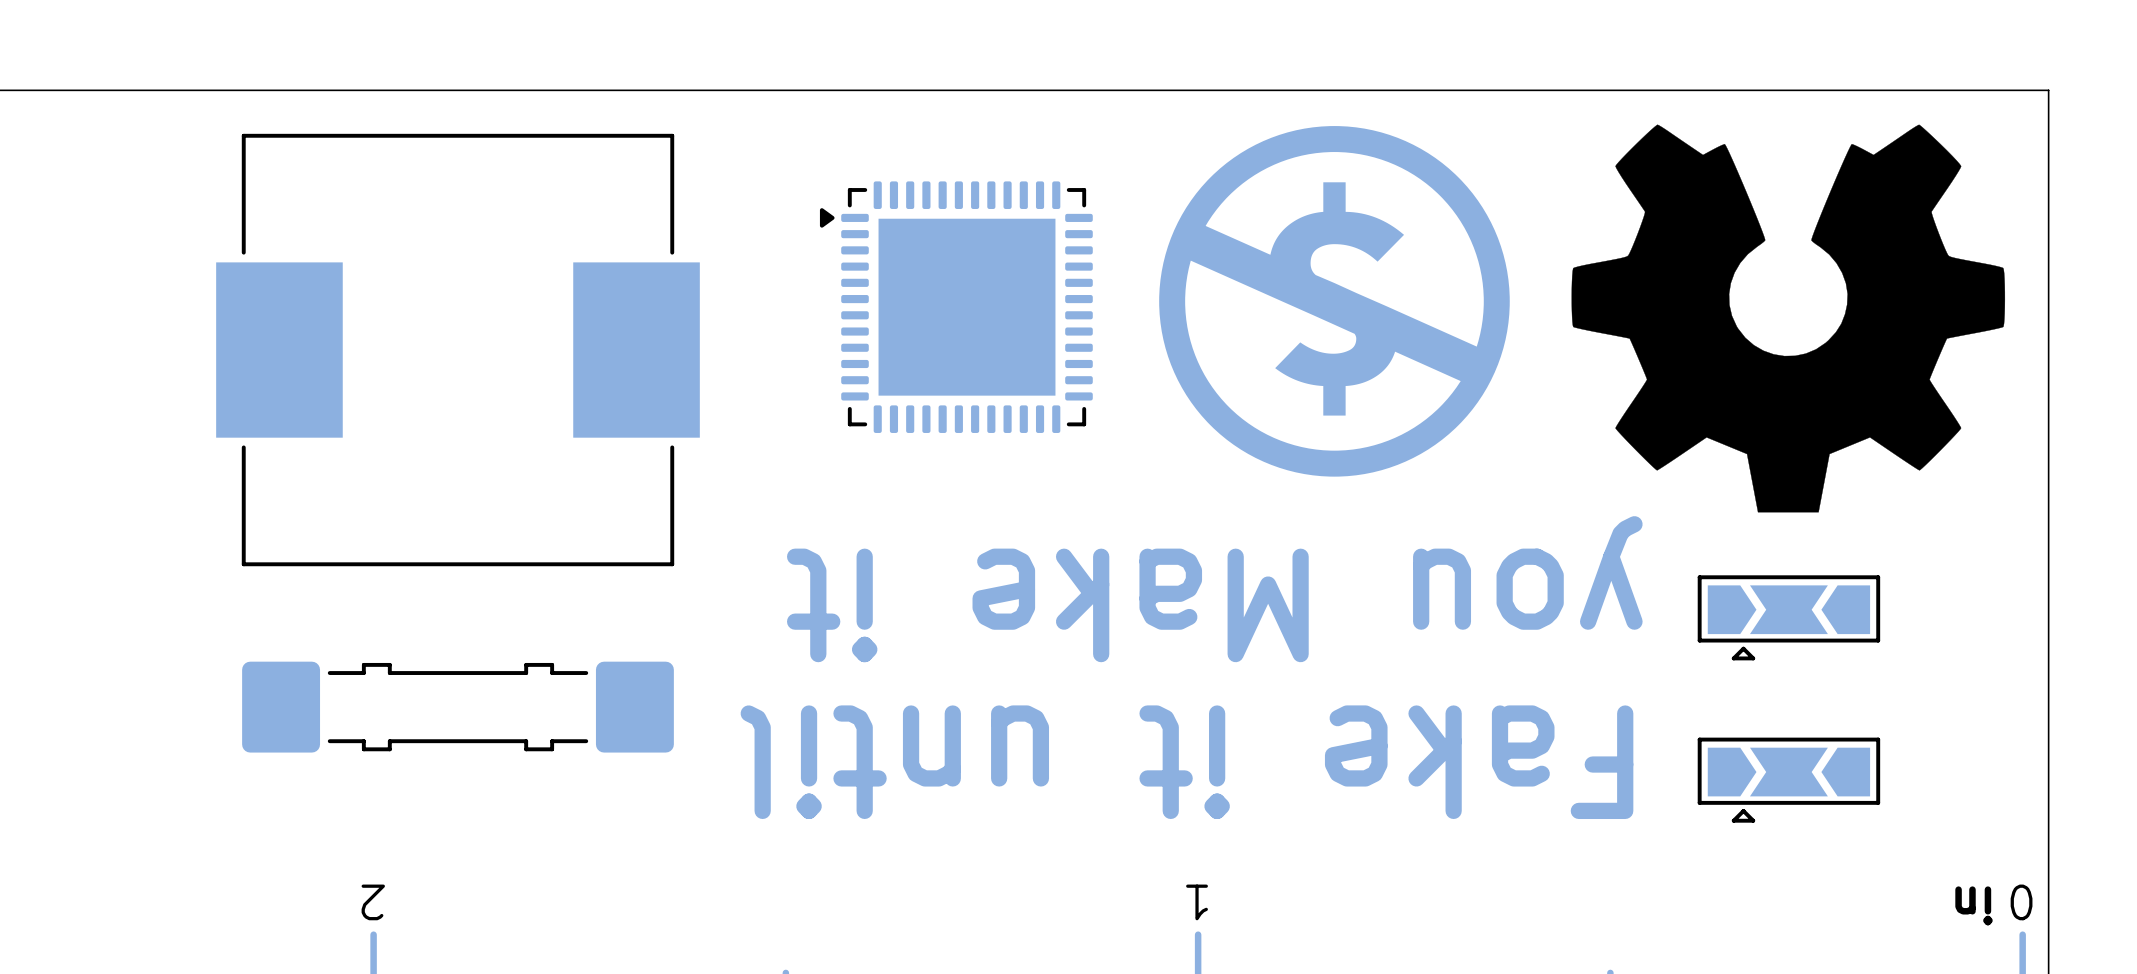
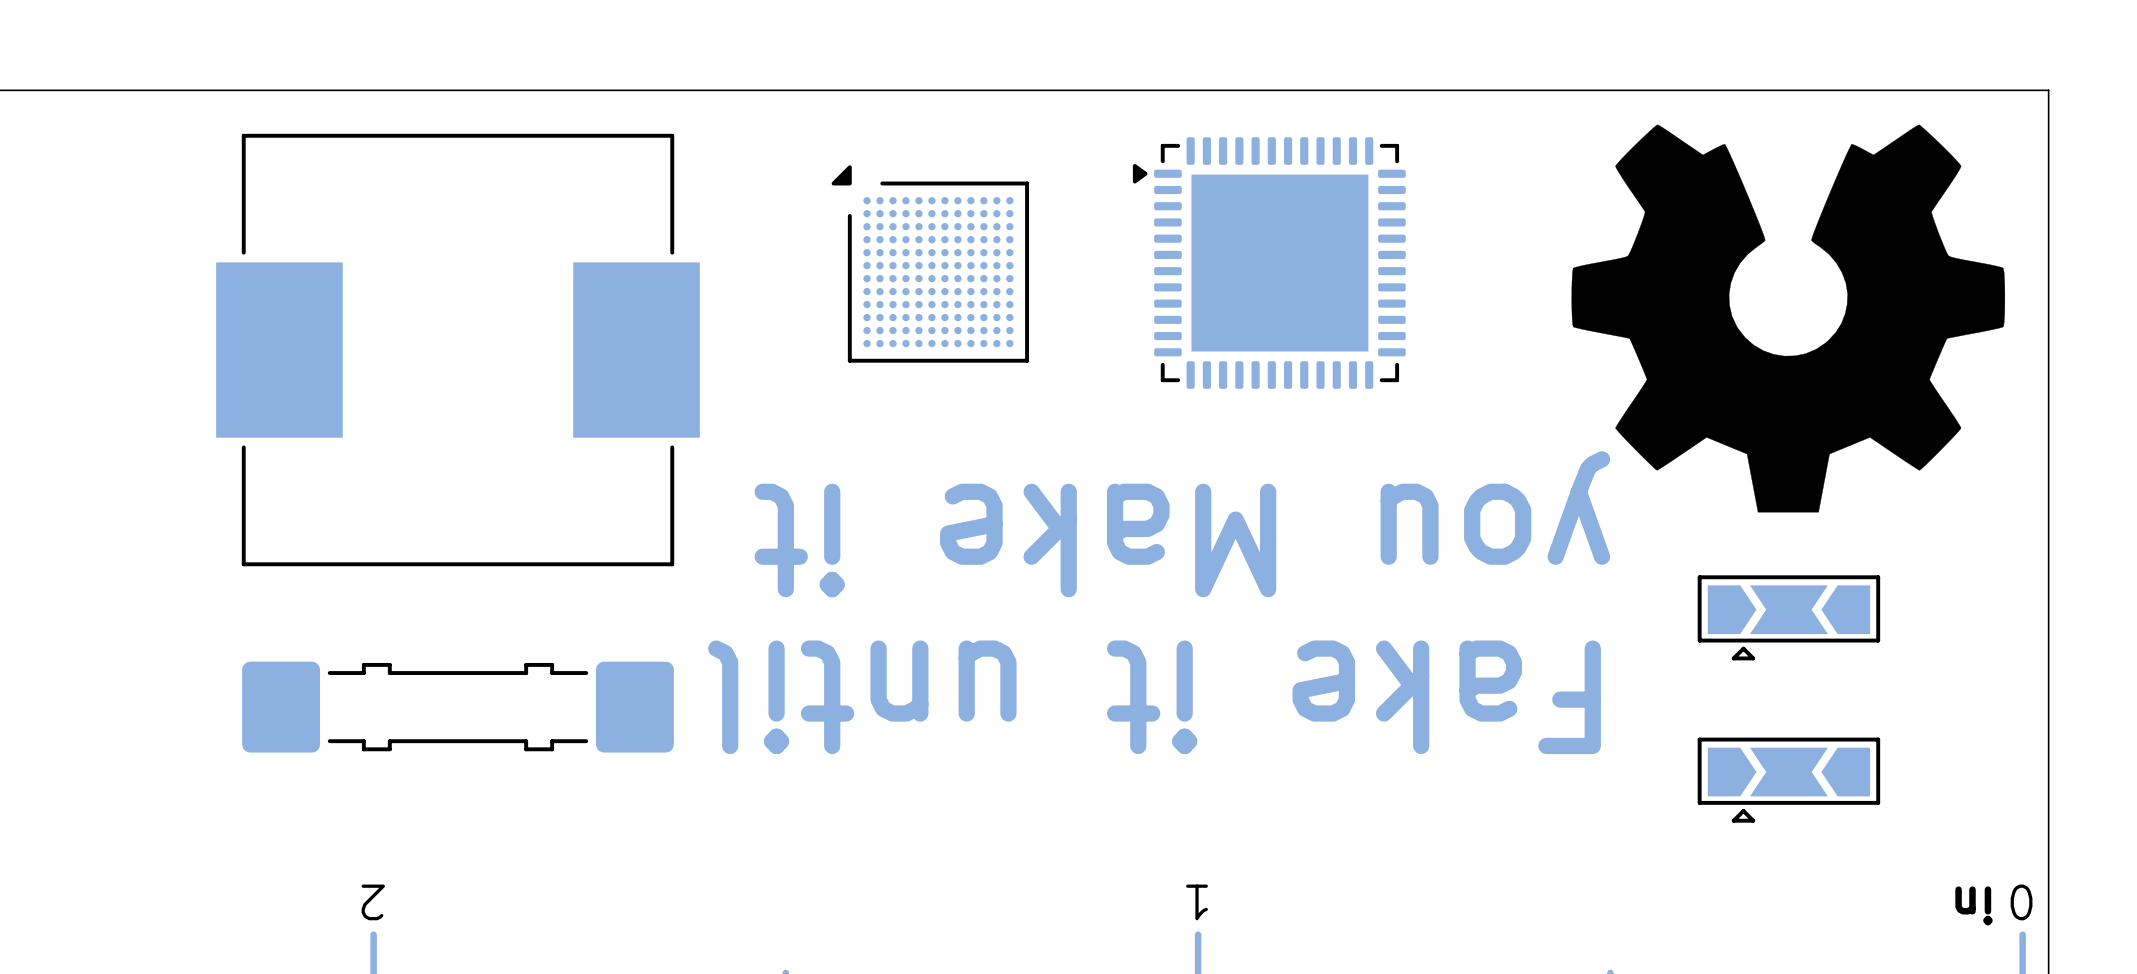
drawing: [1159, 126, 1510, 477] -> none
part: none -> (930, 264)
part position: (956, 307) -> (1269, 263)
text position: you Make it (1214, 589) -> you Make it (1182, 524)
text position: Fake it until (1186, 762) -> Fake it until (1154, 697)

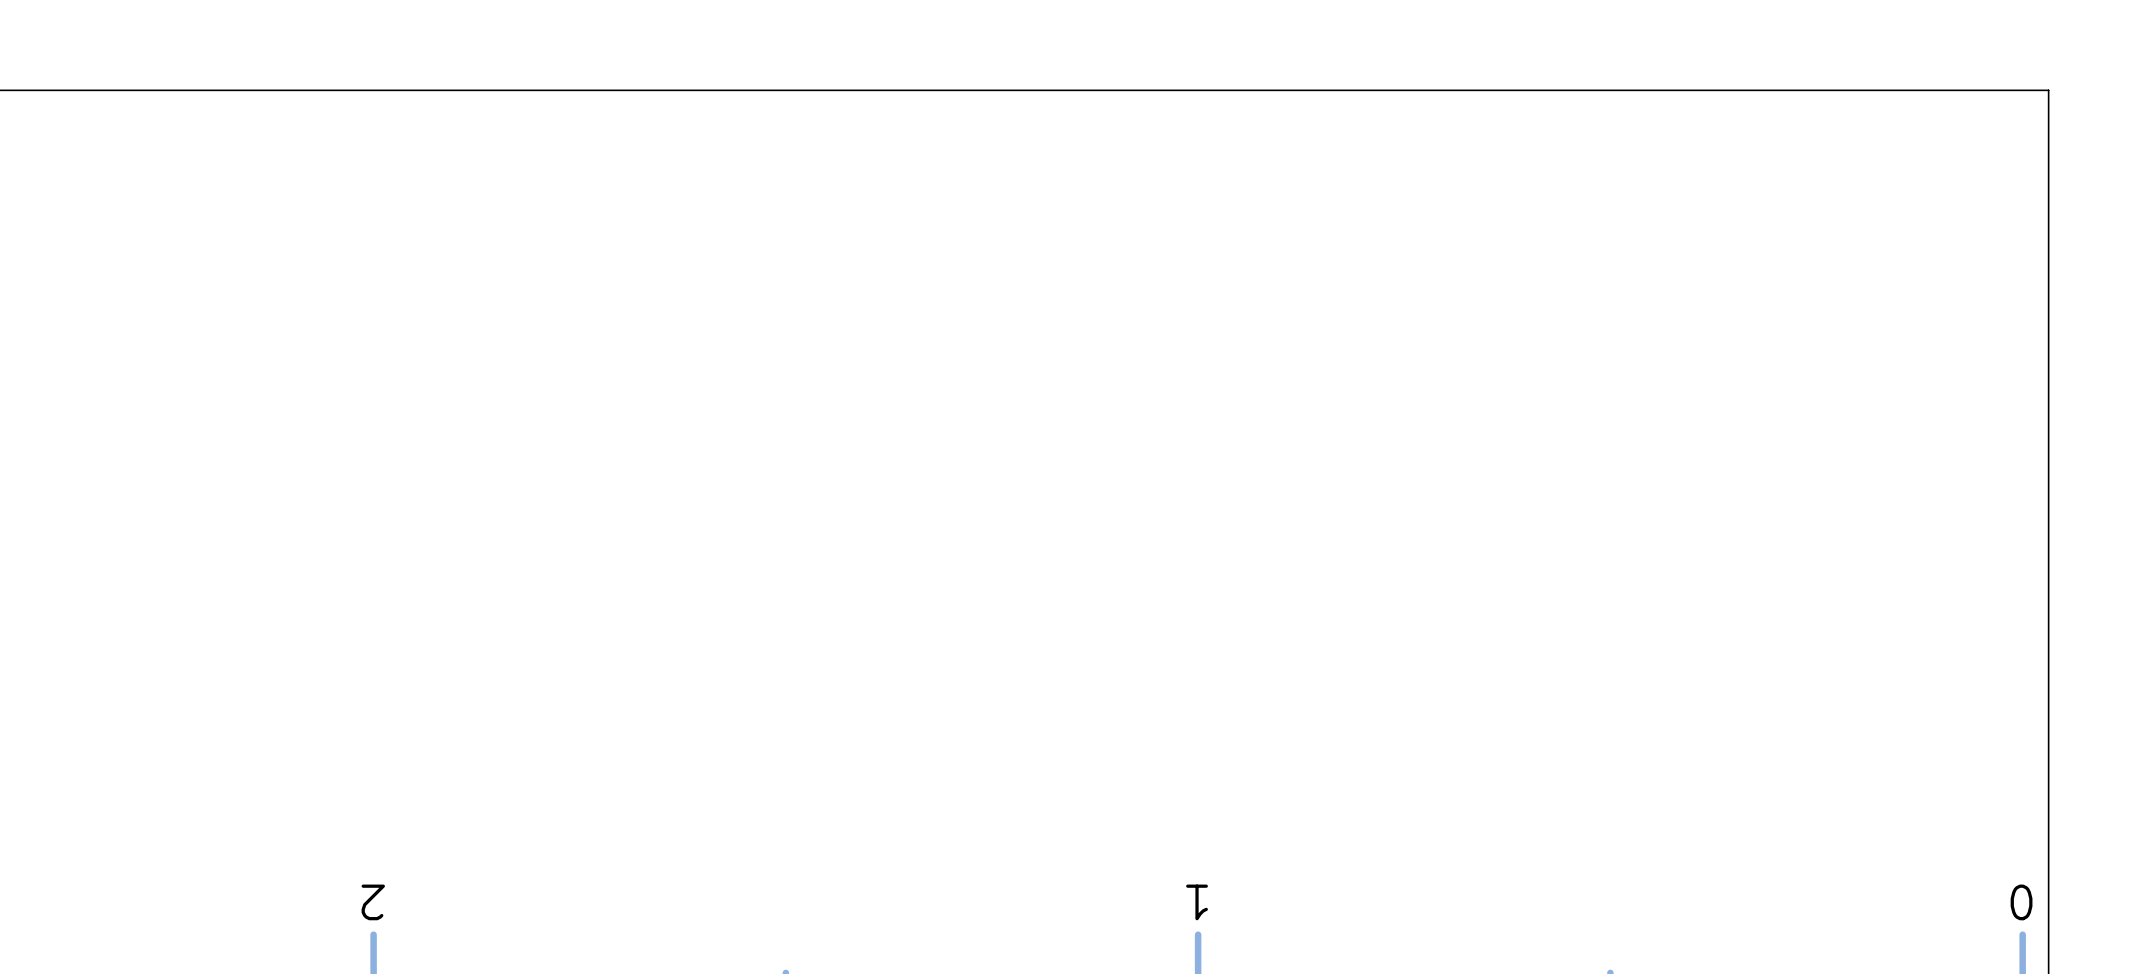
drawing: [1571, 124, 2006, 513] -> none
part: (1269, 263) -> none
part: (930, 264) -> none
part: (457, 350) -> none
text: you Make it (1182, 524) -> none
part: (1788, 617) -> none
text: Fake it until (1154, 697) -> none
part: (457, 707) -> none
part: (1788, 780) -> none
text: in (1974, 905) -> none

